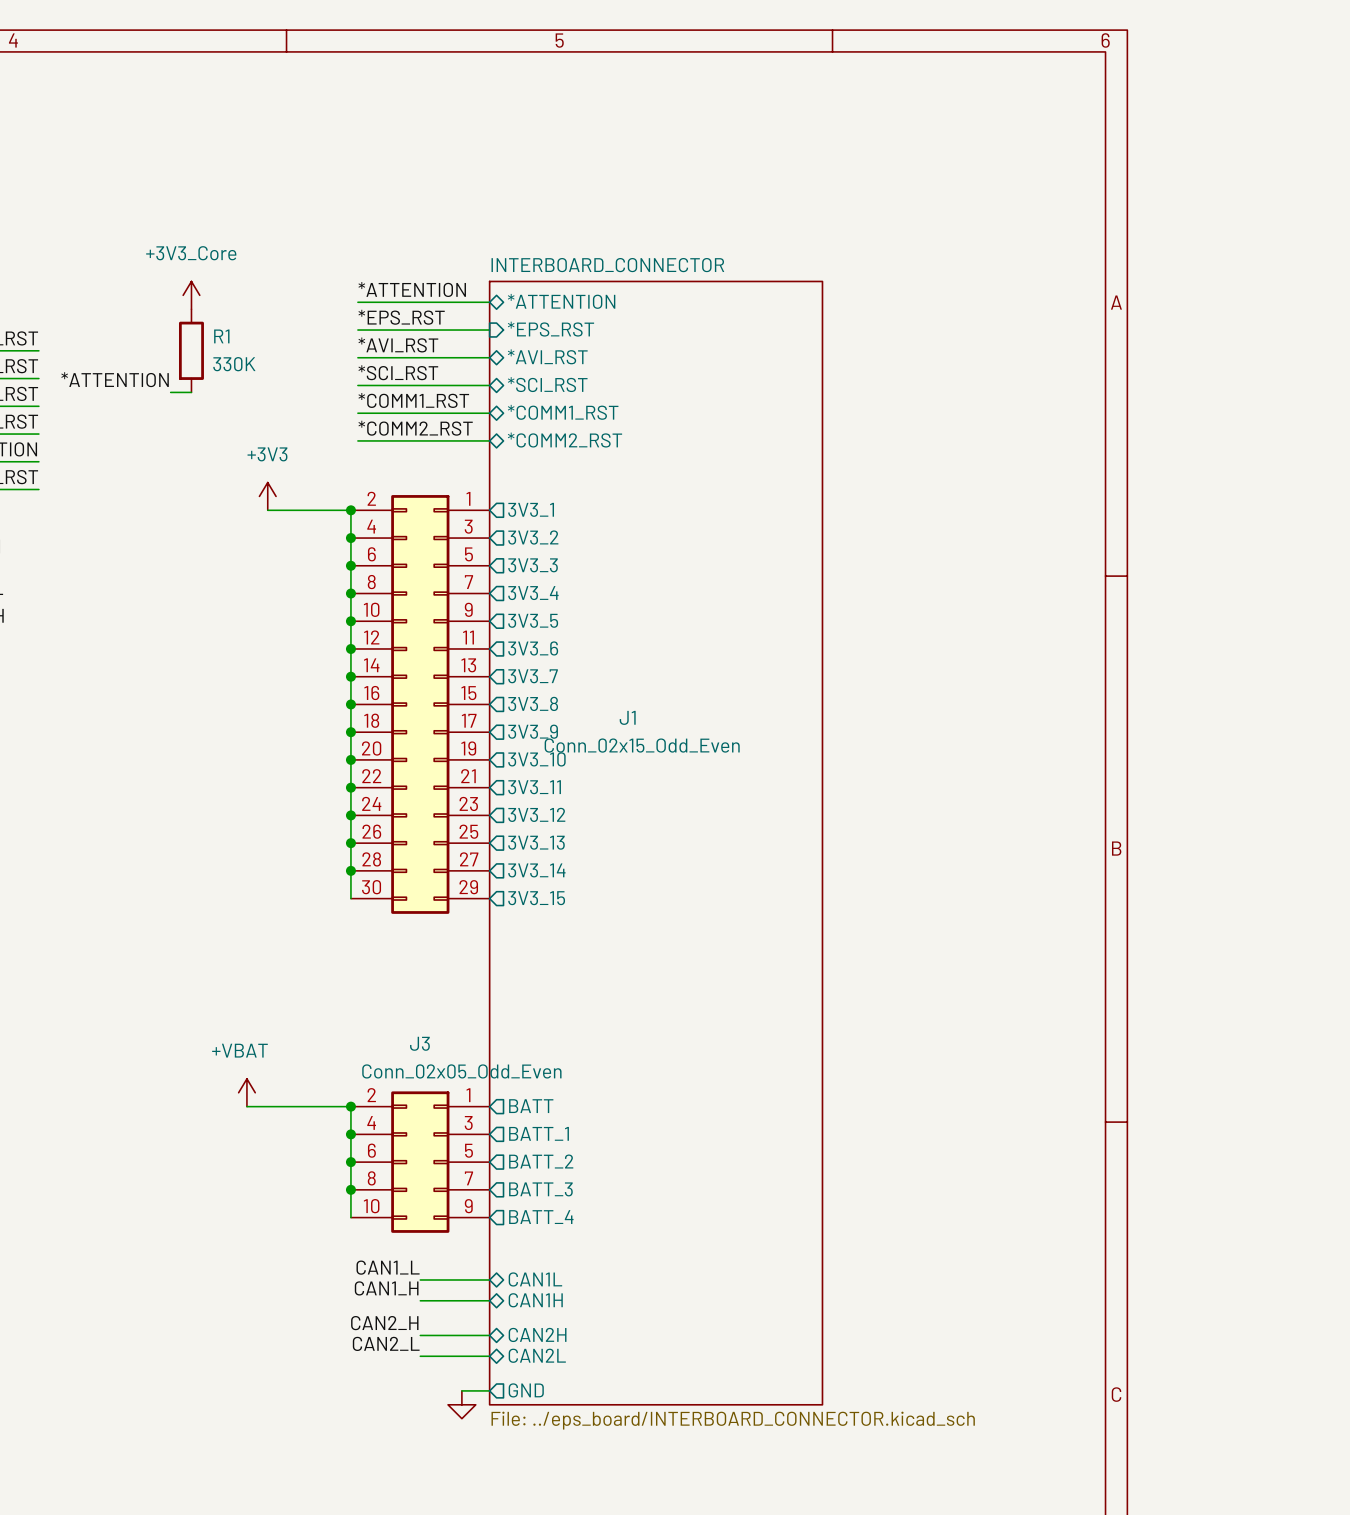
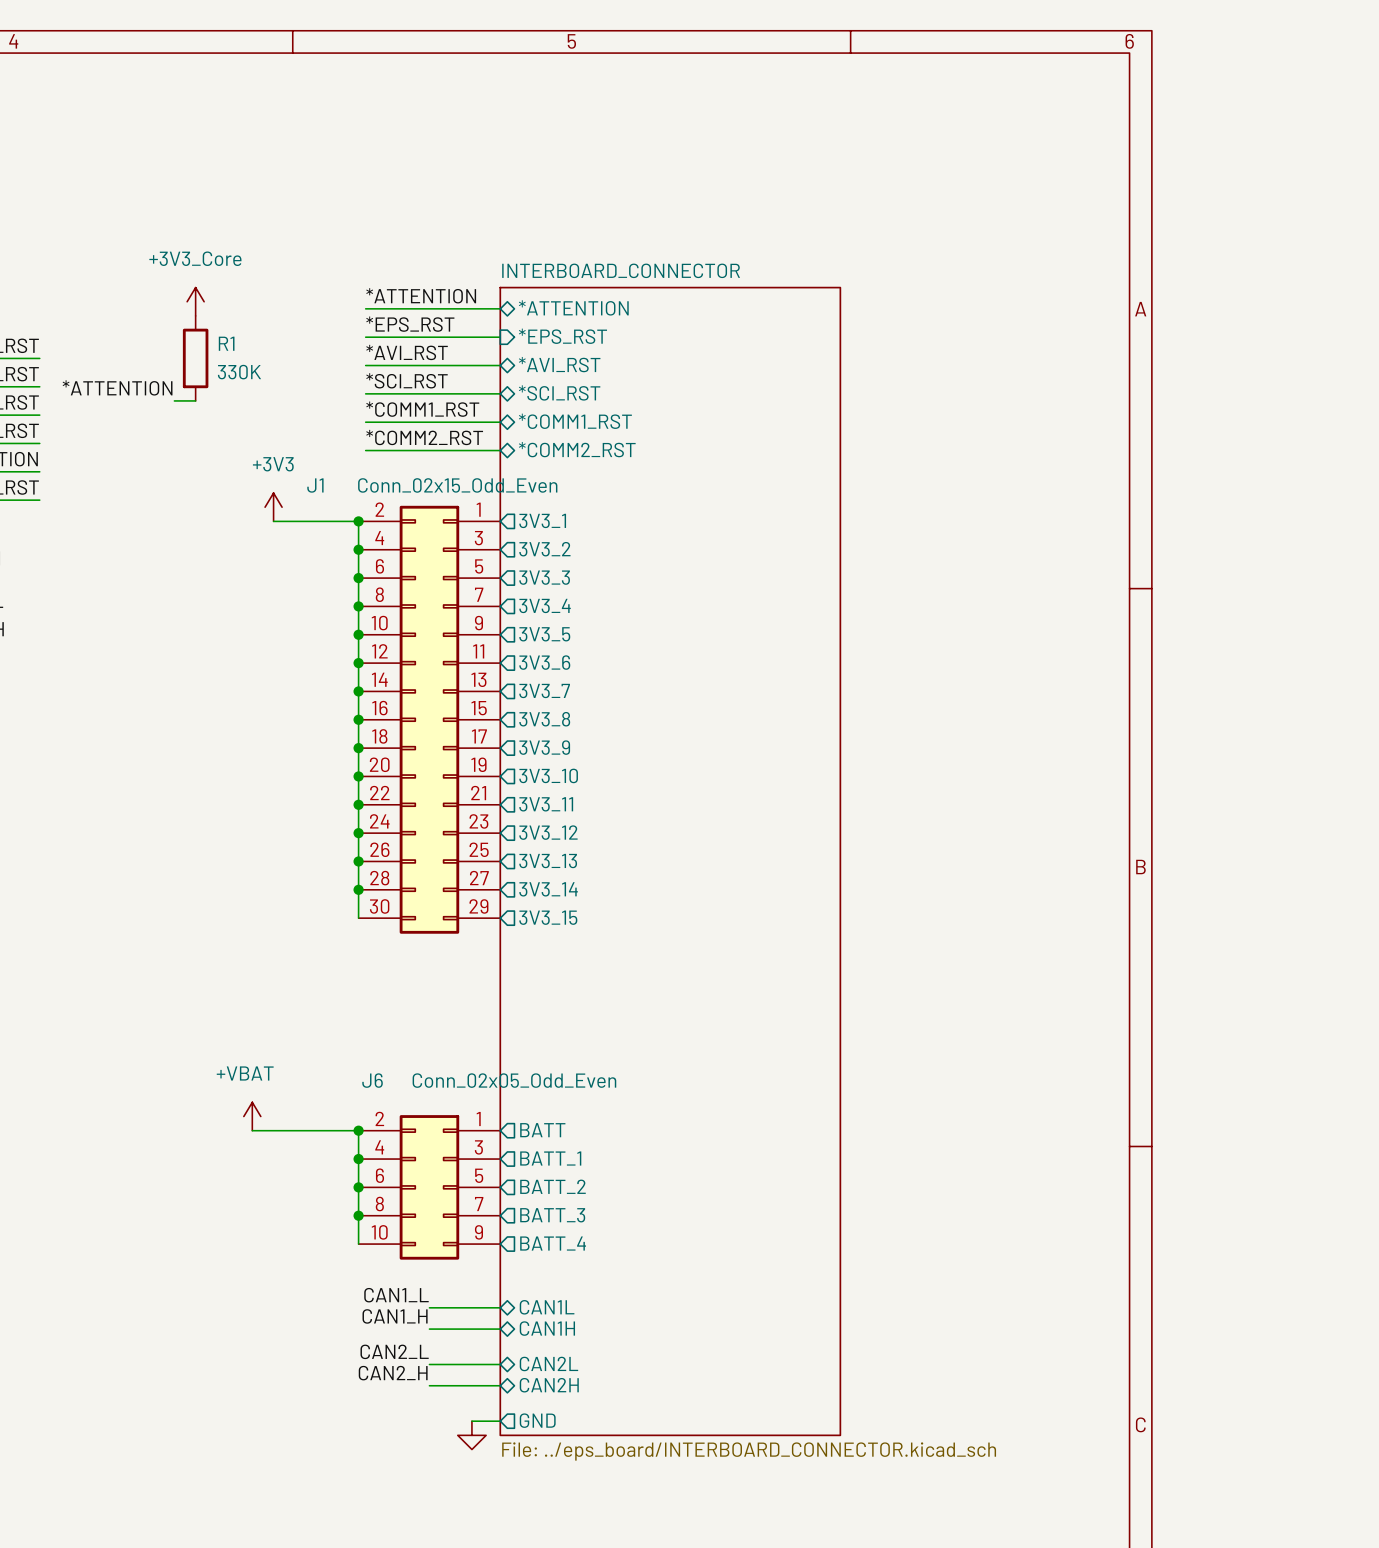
J1 name position: J1 (627, 717) -> J1 (315, 485)
J1 value position: Conn_02x15_Odd_Even (642, 745) -> Conn_02x15_Odd_Even (457, 485)
J3 name: J3 (419, 1043) -> J6 (372, 1080)
J3 value position: Conn_02x05_Odd_Even (461, 1071) -> Conn_02x05_Odd_Even (514, 1080)
label: CAN2_H (384, 1323) -> CAN2_L (394, 1351)
sheet pin: CAN2H (537, 1334) -> CAN2L (548, 1363)
label: CAN2_L (386, 1343) -> CAN2_H (393, 1373)
sheet pin: CAN2L (537, 1355) -> CAN2H (549, 1385)

